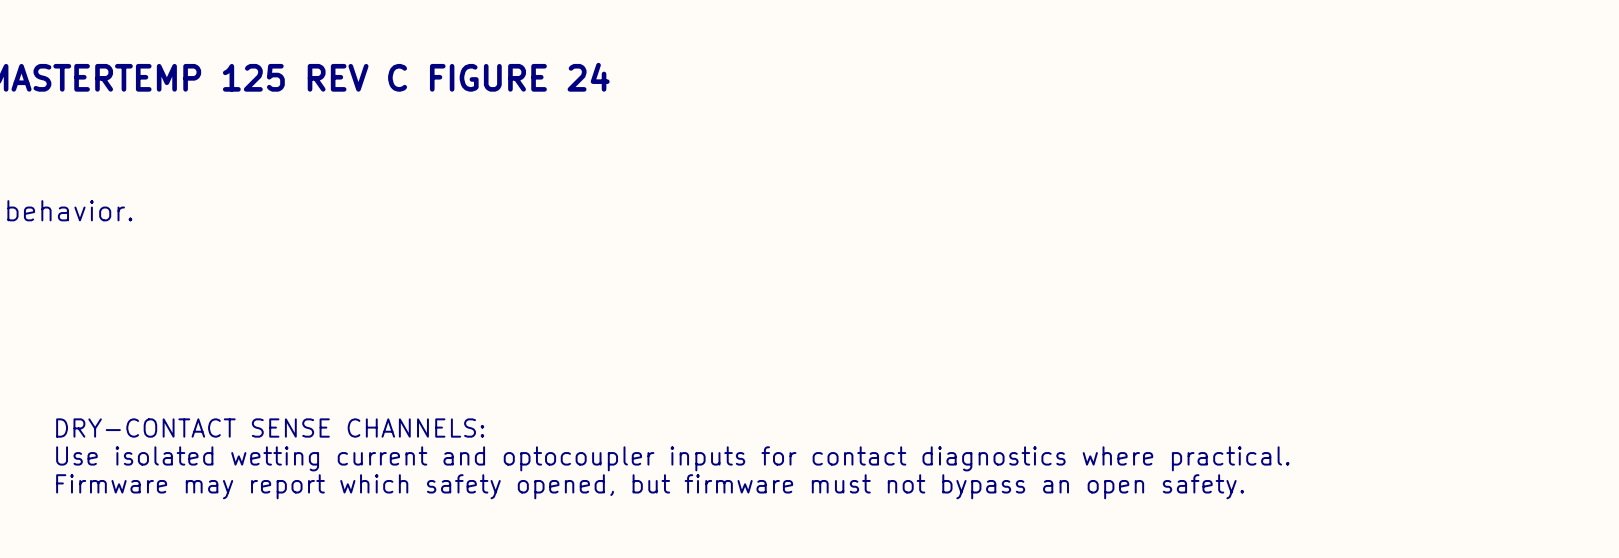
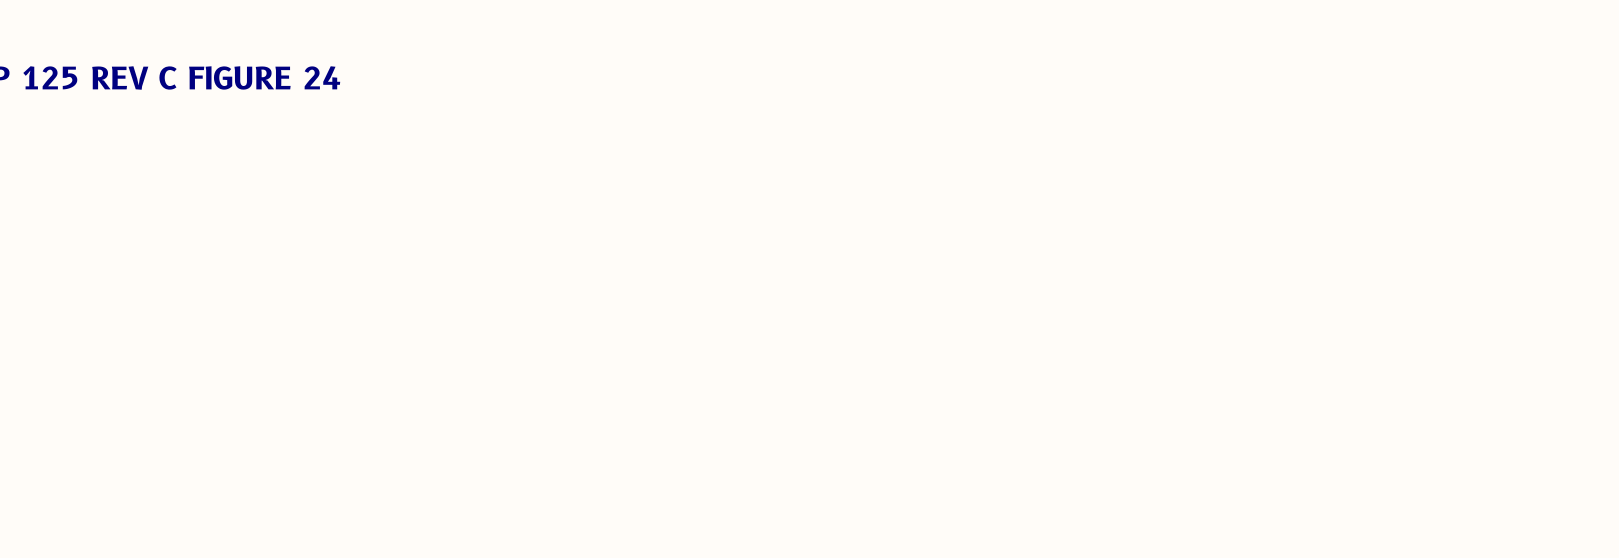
text: DRY-CONTACT SENSE CHANNELS: (270, 428) -> none
text: Use isolated wetting current and optocoupler inputs for contact diagnostics where practical. (672, 458) -> none
text: Firmware may report which safety opened, but firmware must not bypass an open safety. (650, 486) -> none

